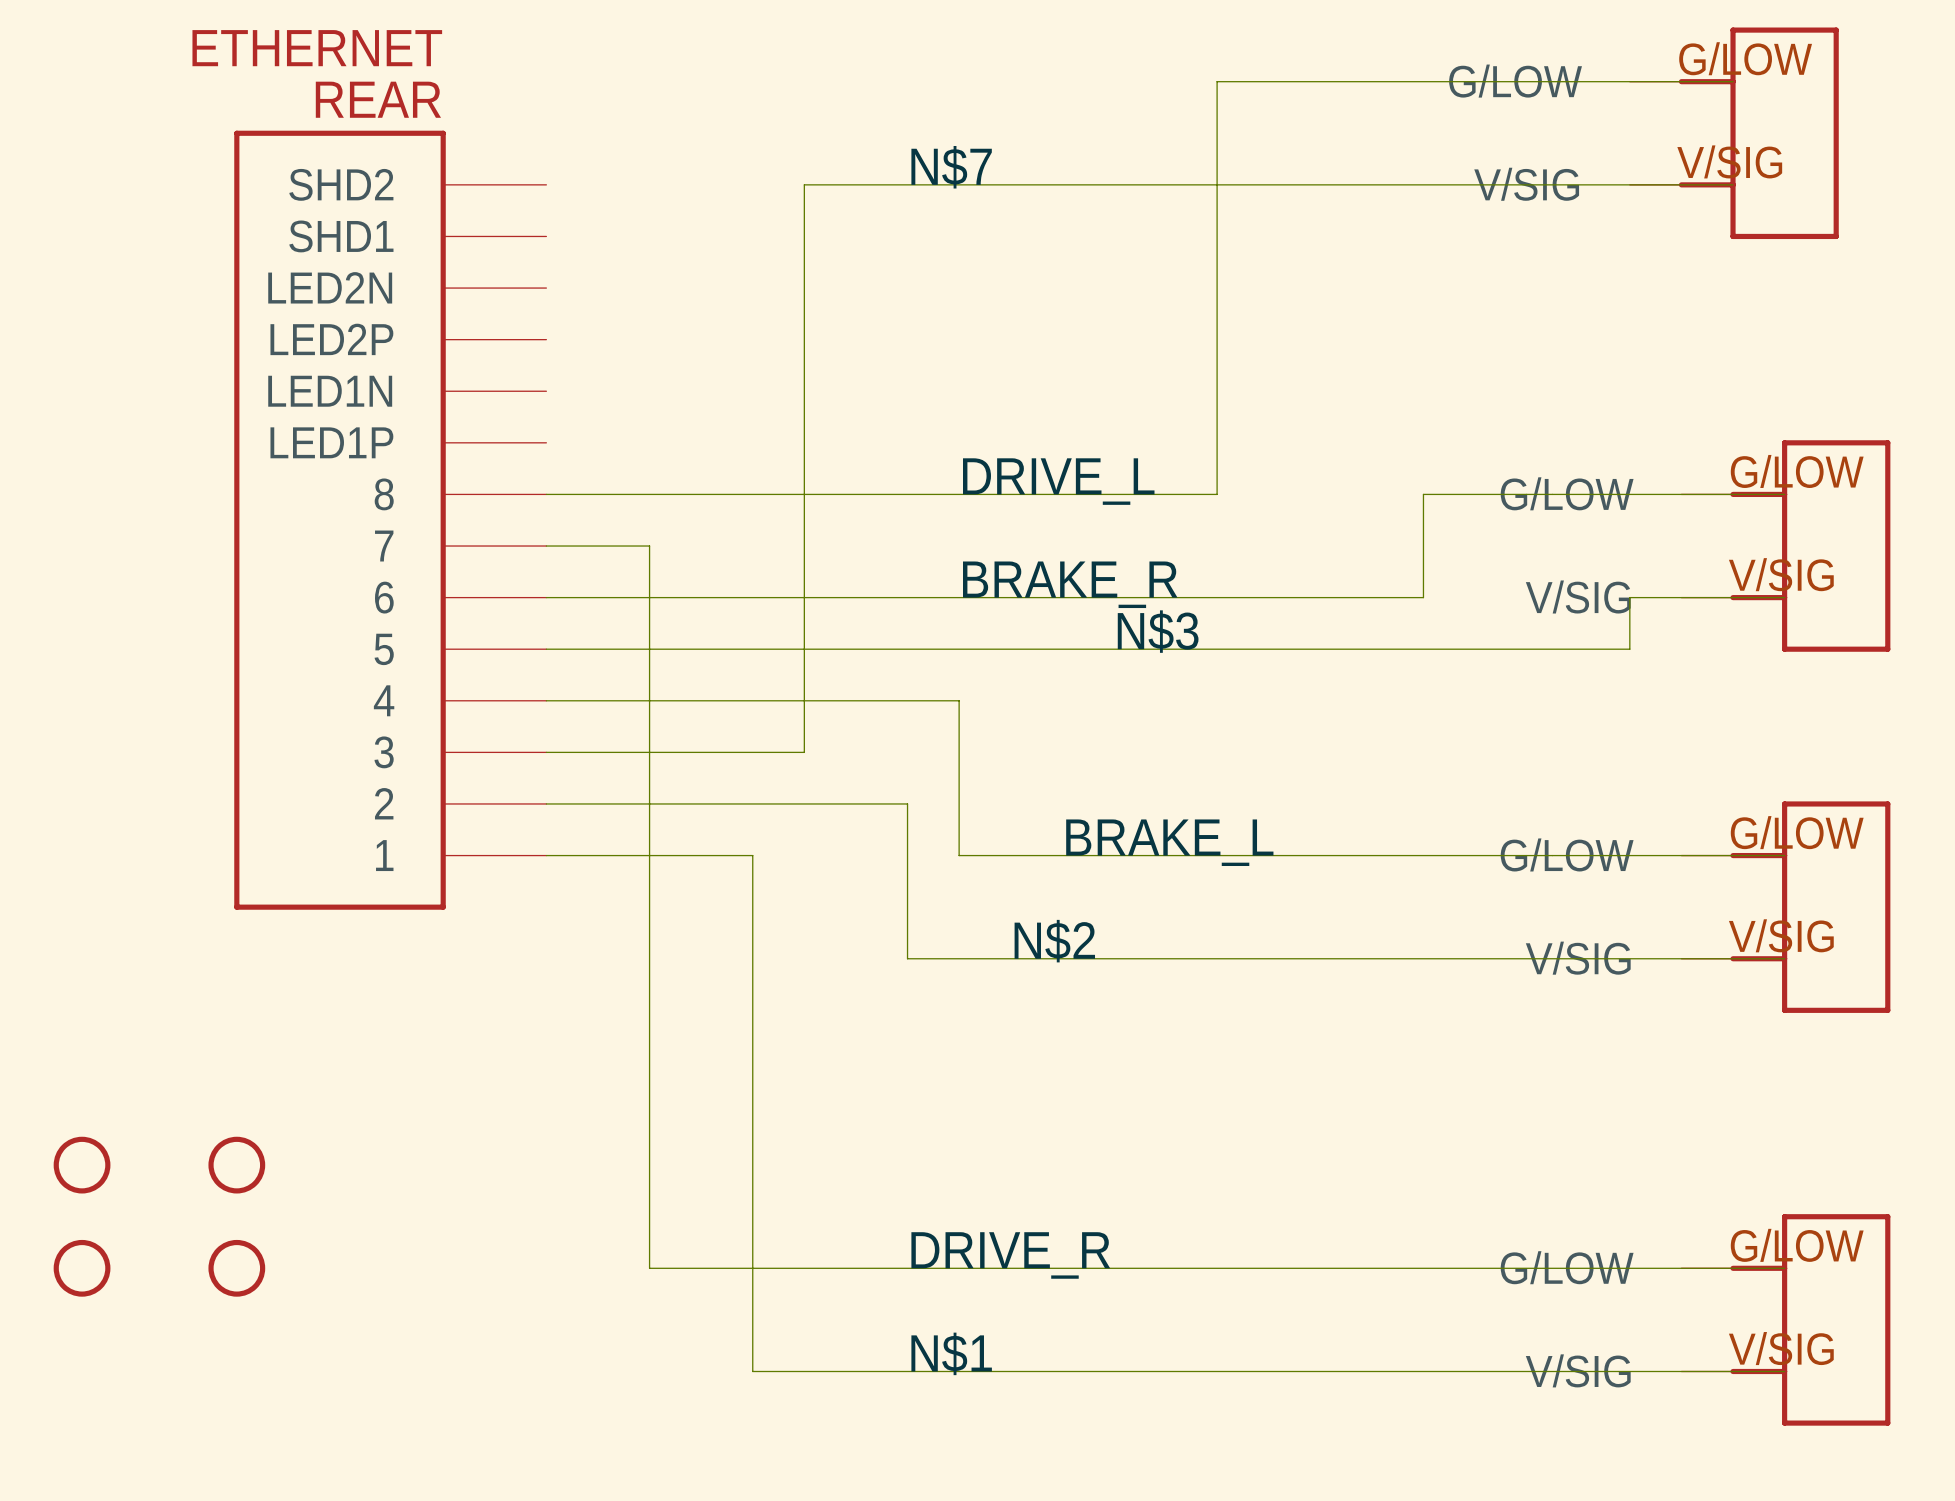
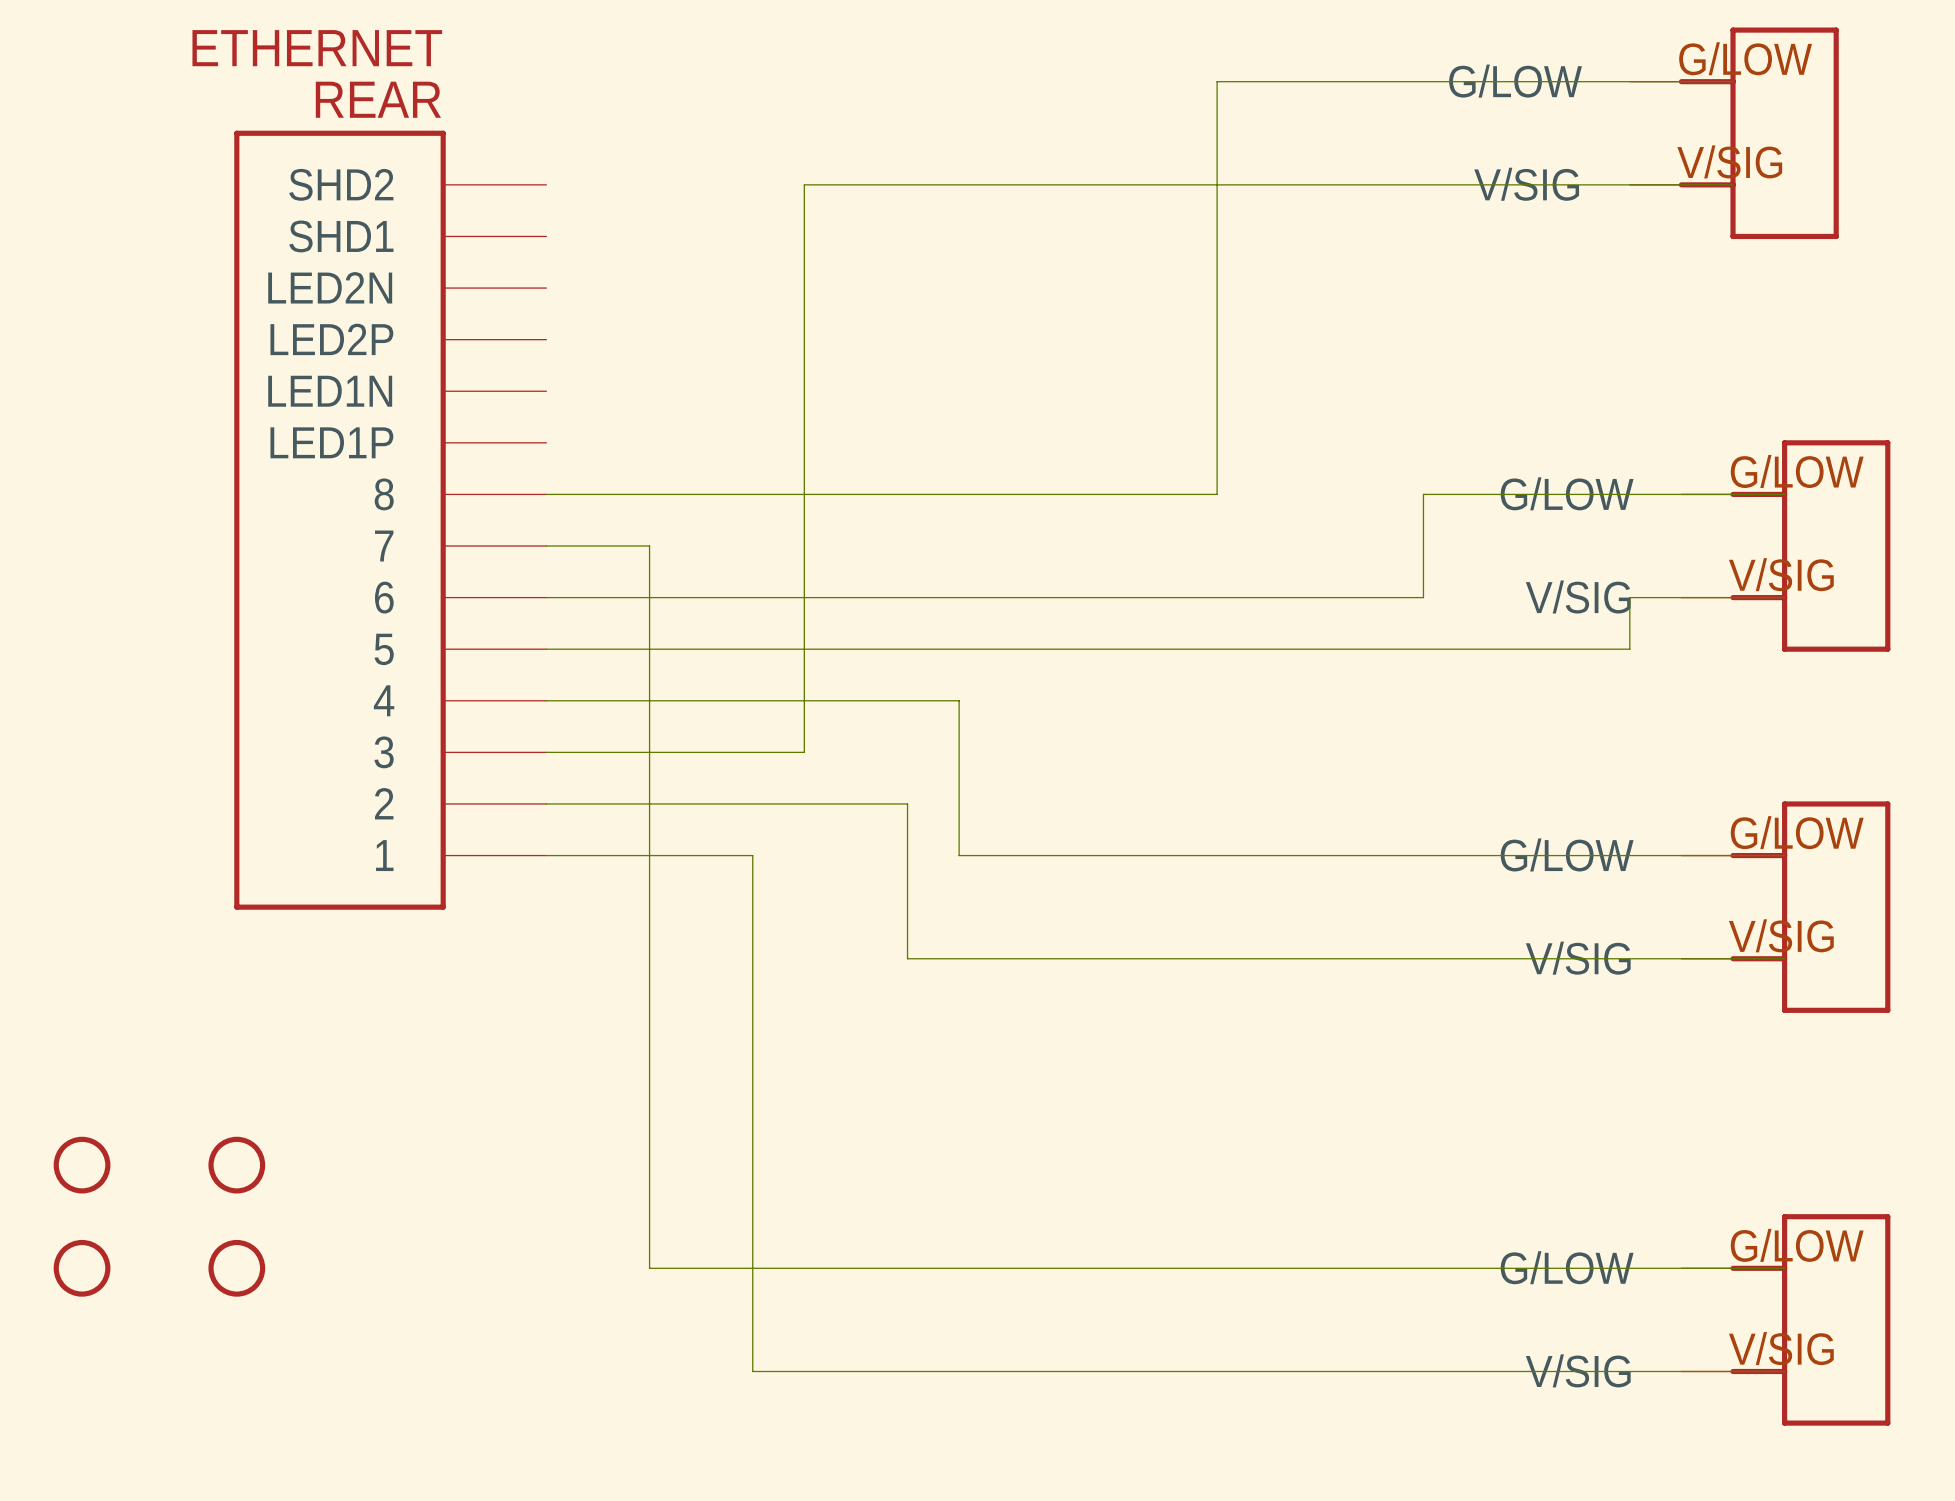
label: N$7 (951, 167) -> none
label: DRIVE_L (1058, 481) -> none
label: BRAKE_R (1070, 584) -> none
label: N$3 (1158, 631) -> none
label: BRAKE_L (1169, 842) -> none
label: N$2 (1054, 941) -> none
label: DRIVE_R (1010, 1255) -> none
label: N$1 (951, 1353) -> none

